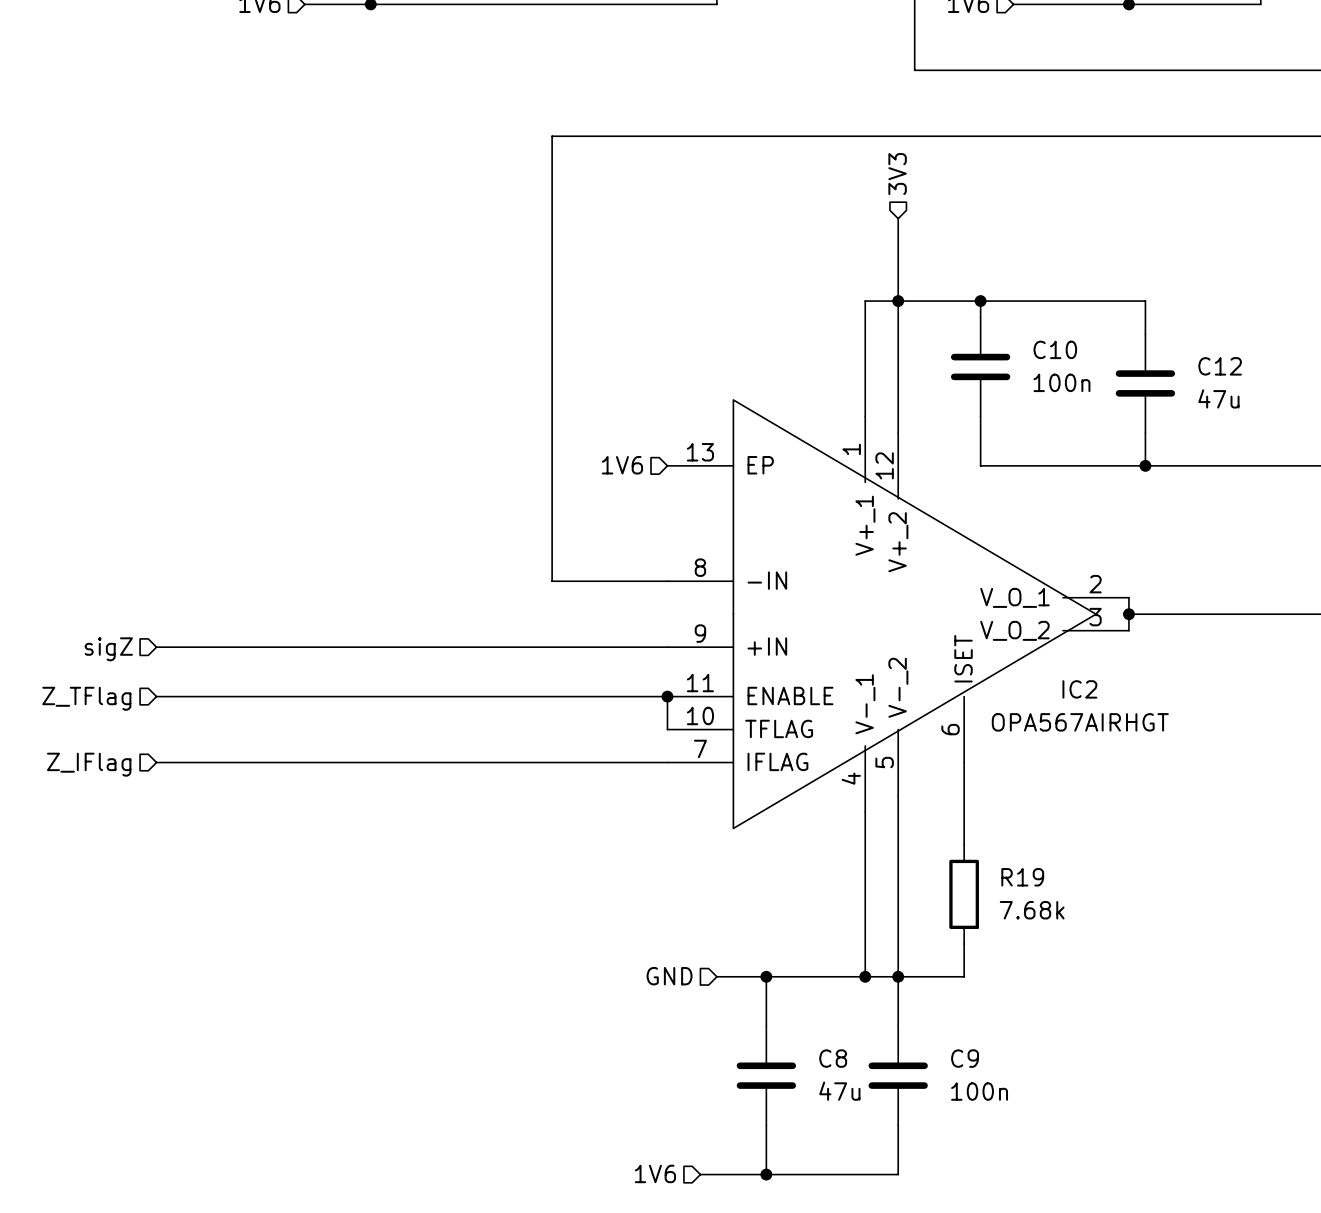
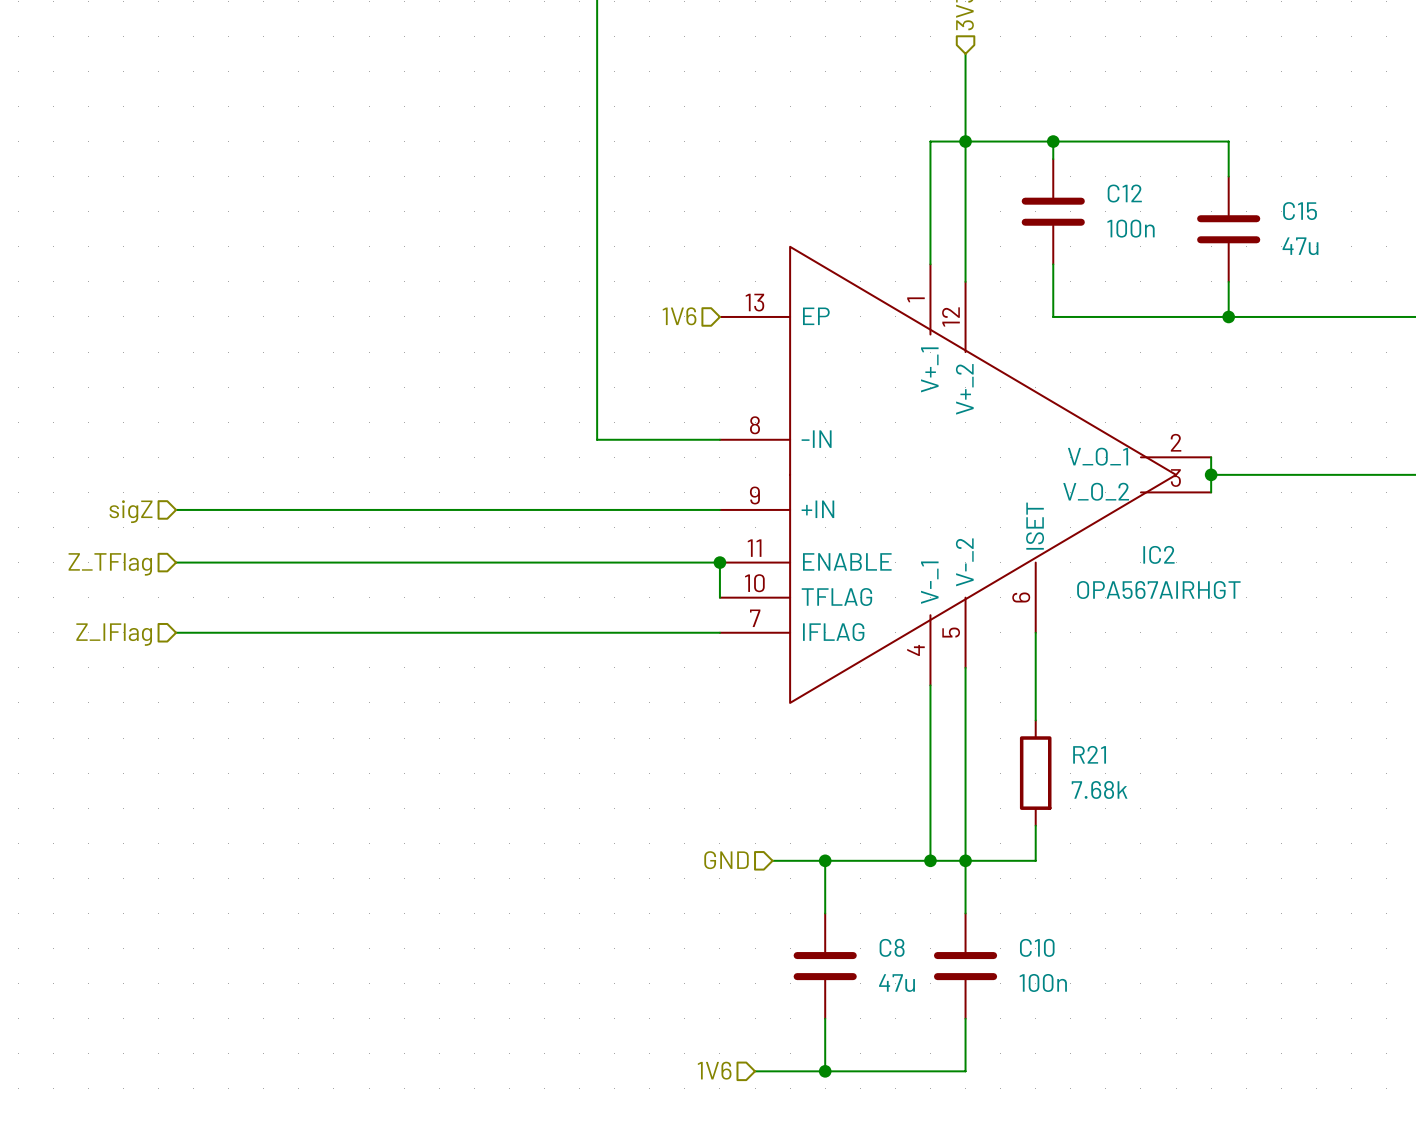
C10 name: C10 (1055, 349) -> C12 (1124, 193)
C12 name: C12 (1220, 366) -> C15 (1300, 211)
R19 name: R19 (1022, 877) -> R21 (1089, 754)
C9 name: C9 (965, 1058) -> C10 (1037, 947)

